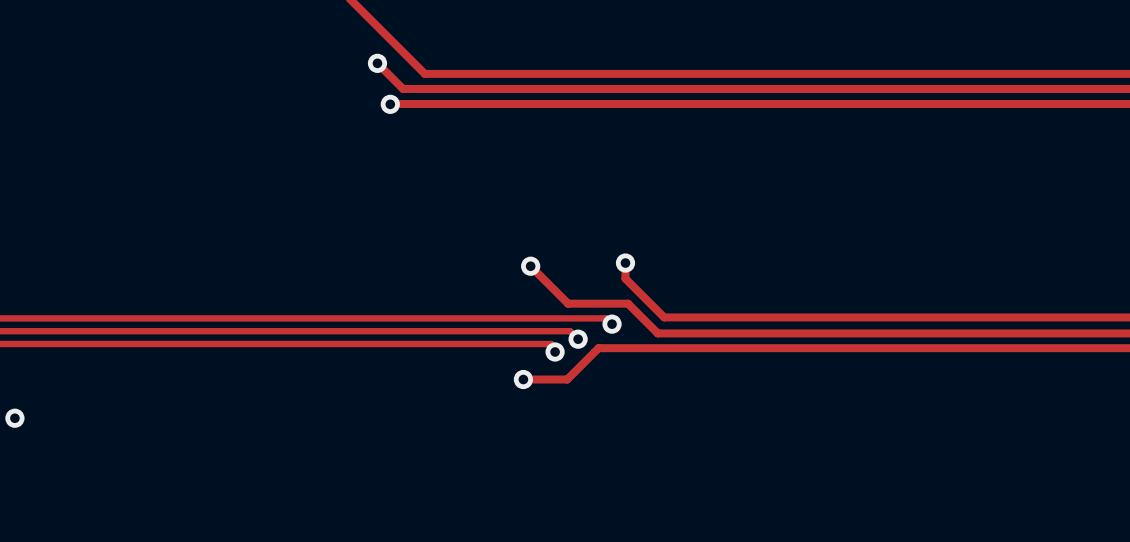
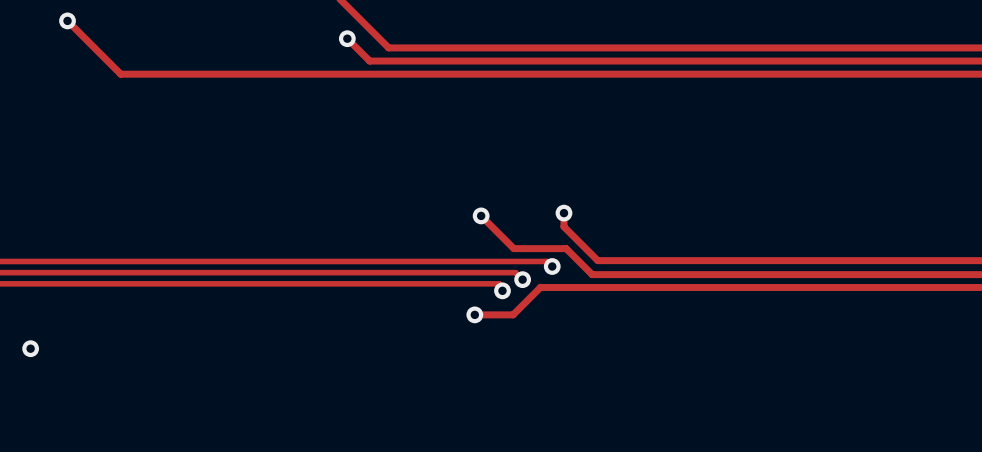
track: none -> (67, 20) (120, 74) (358, 74)
via: none -> (67, 20)
via: (390, 104) -> none

